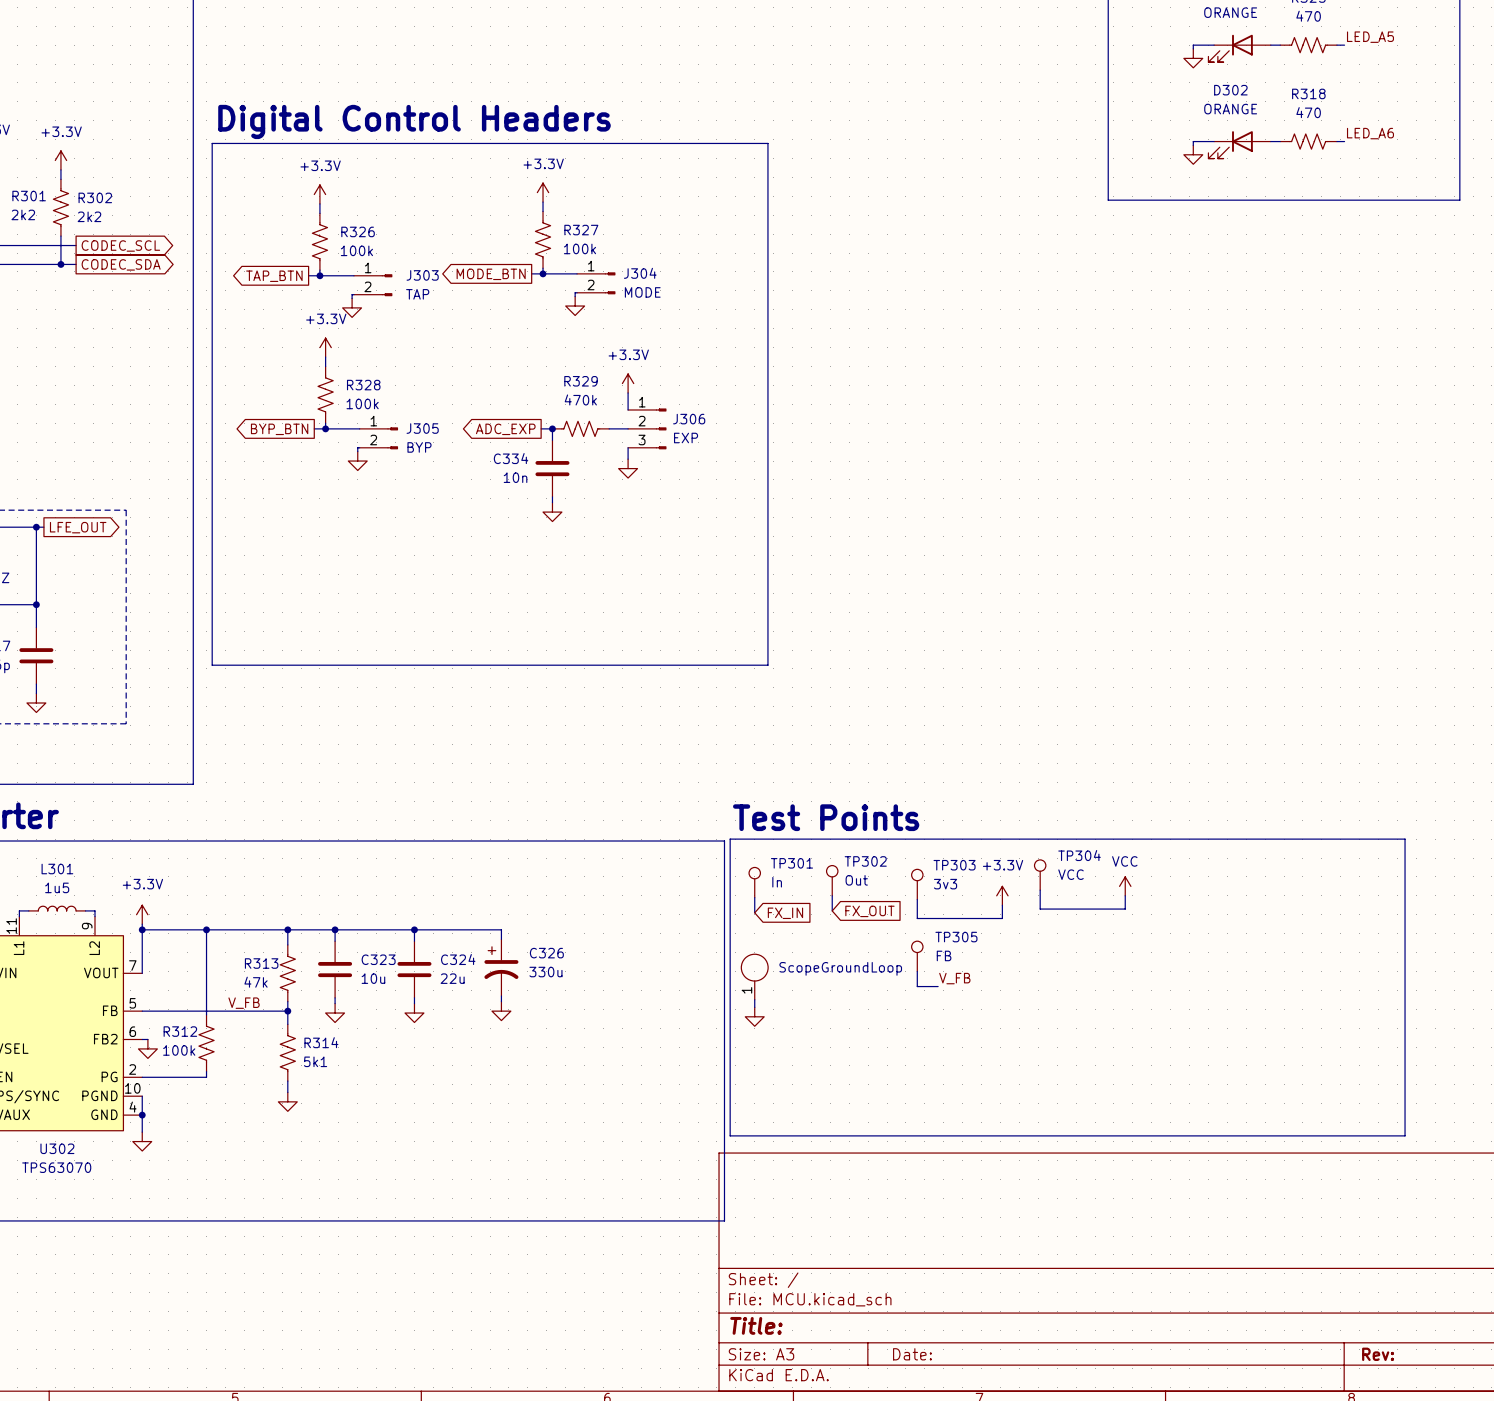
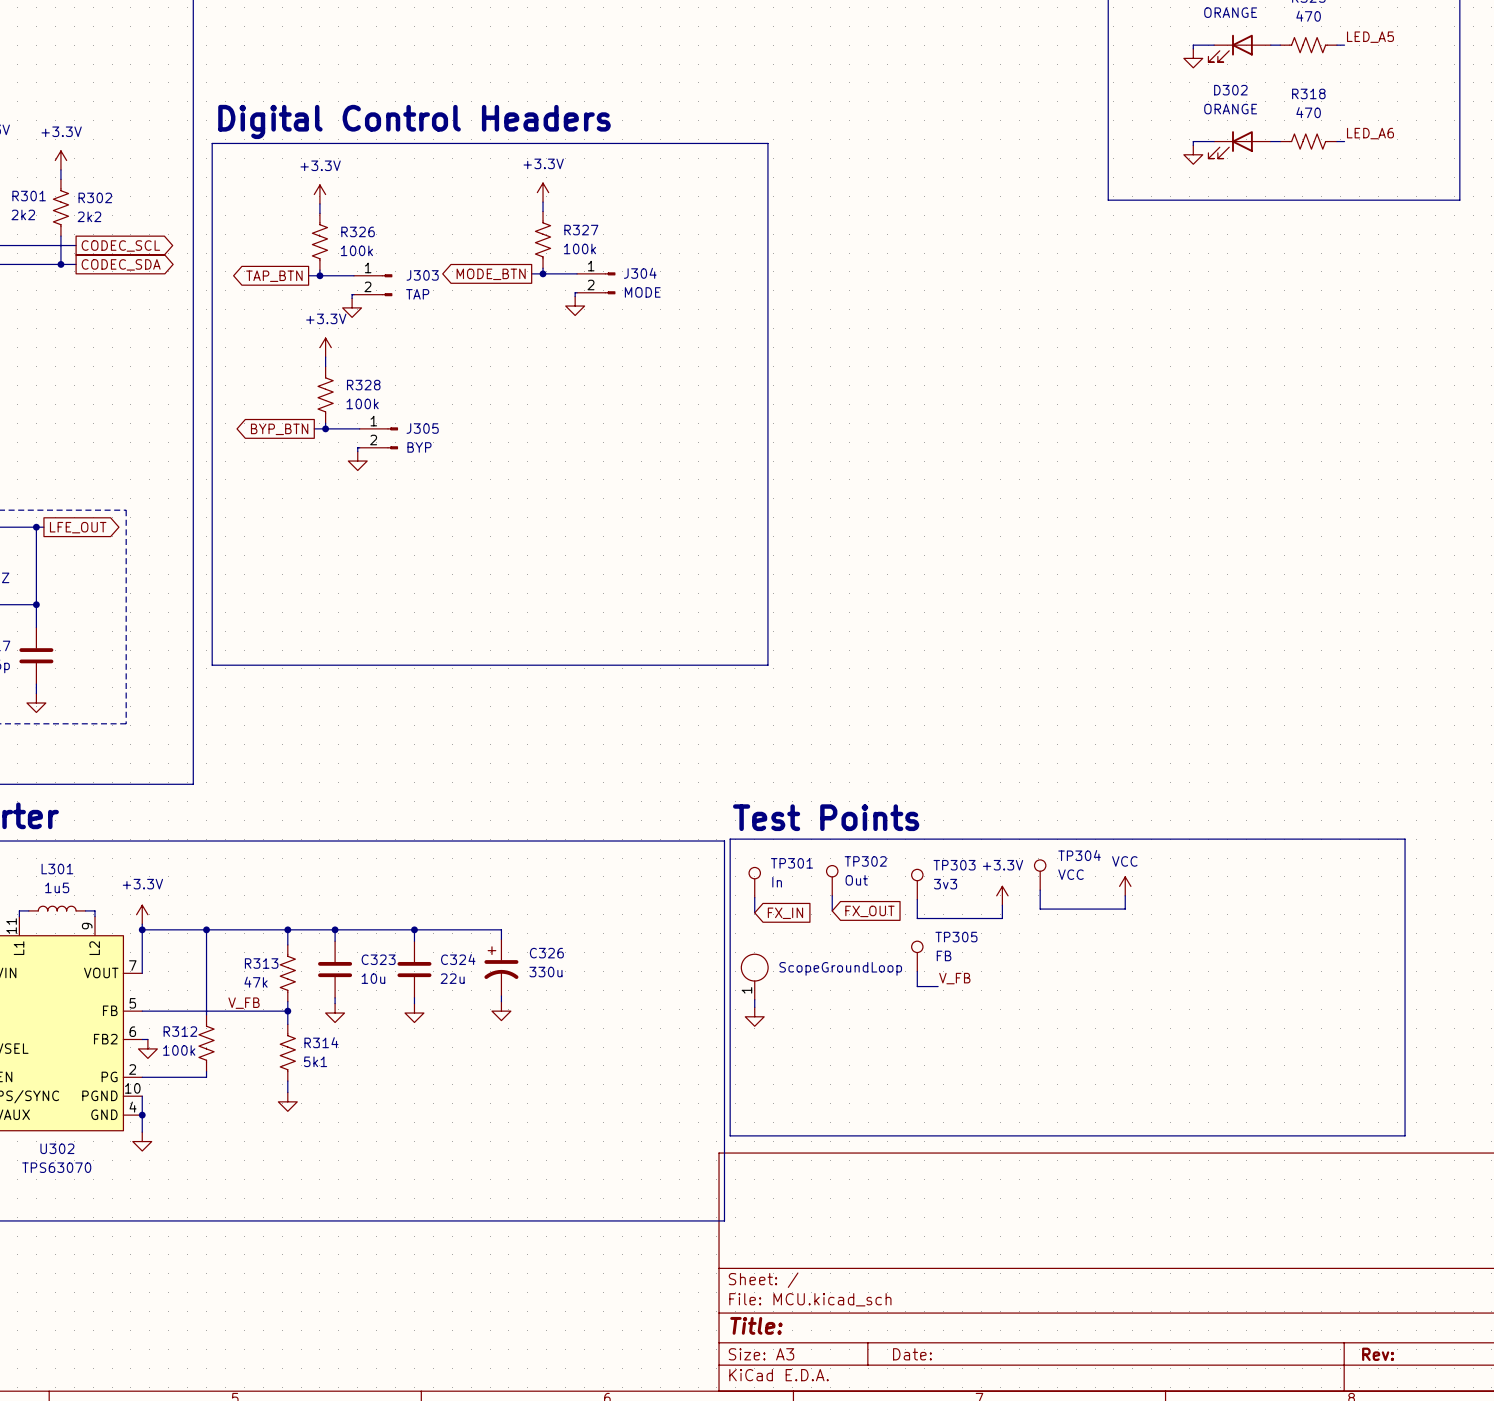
power symbol: +3.3V (628, 383) -> none
wire: (628, 392) (628, 409) -> none
wire: (541, 428) (552, 428) (552, 440) -> none
junction: (552, 428) -> none
R329: 470k (580, 428) -> none
wire: (609, 428) (628, 428) -> none
J306: EXP (647, 428) -> none
global label: ADC_EXP (505, 429) -> none
wire: (628, 447) (628, 459) -> none
C334: 10n (552, 468) -> none
power symbol: (628, 468) -> none
wire: (552, 496) (552, 502) -> none
power symbol: (552, 512) -> none

